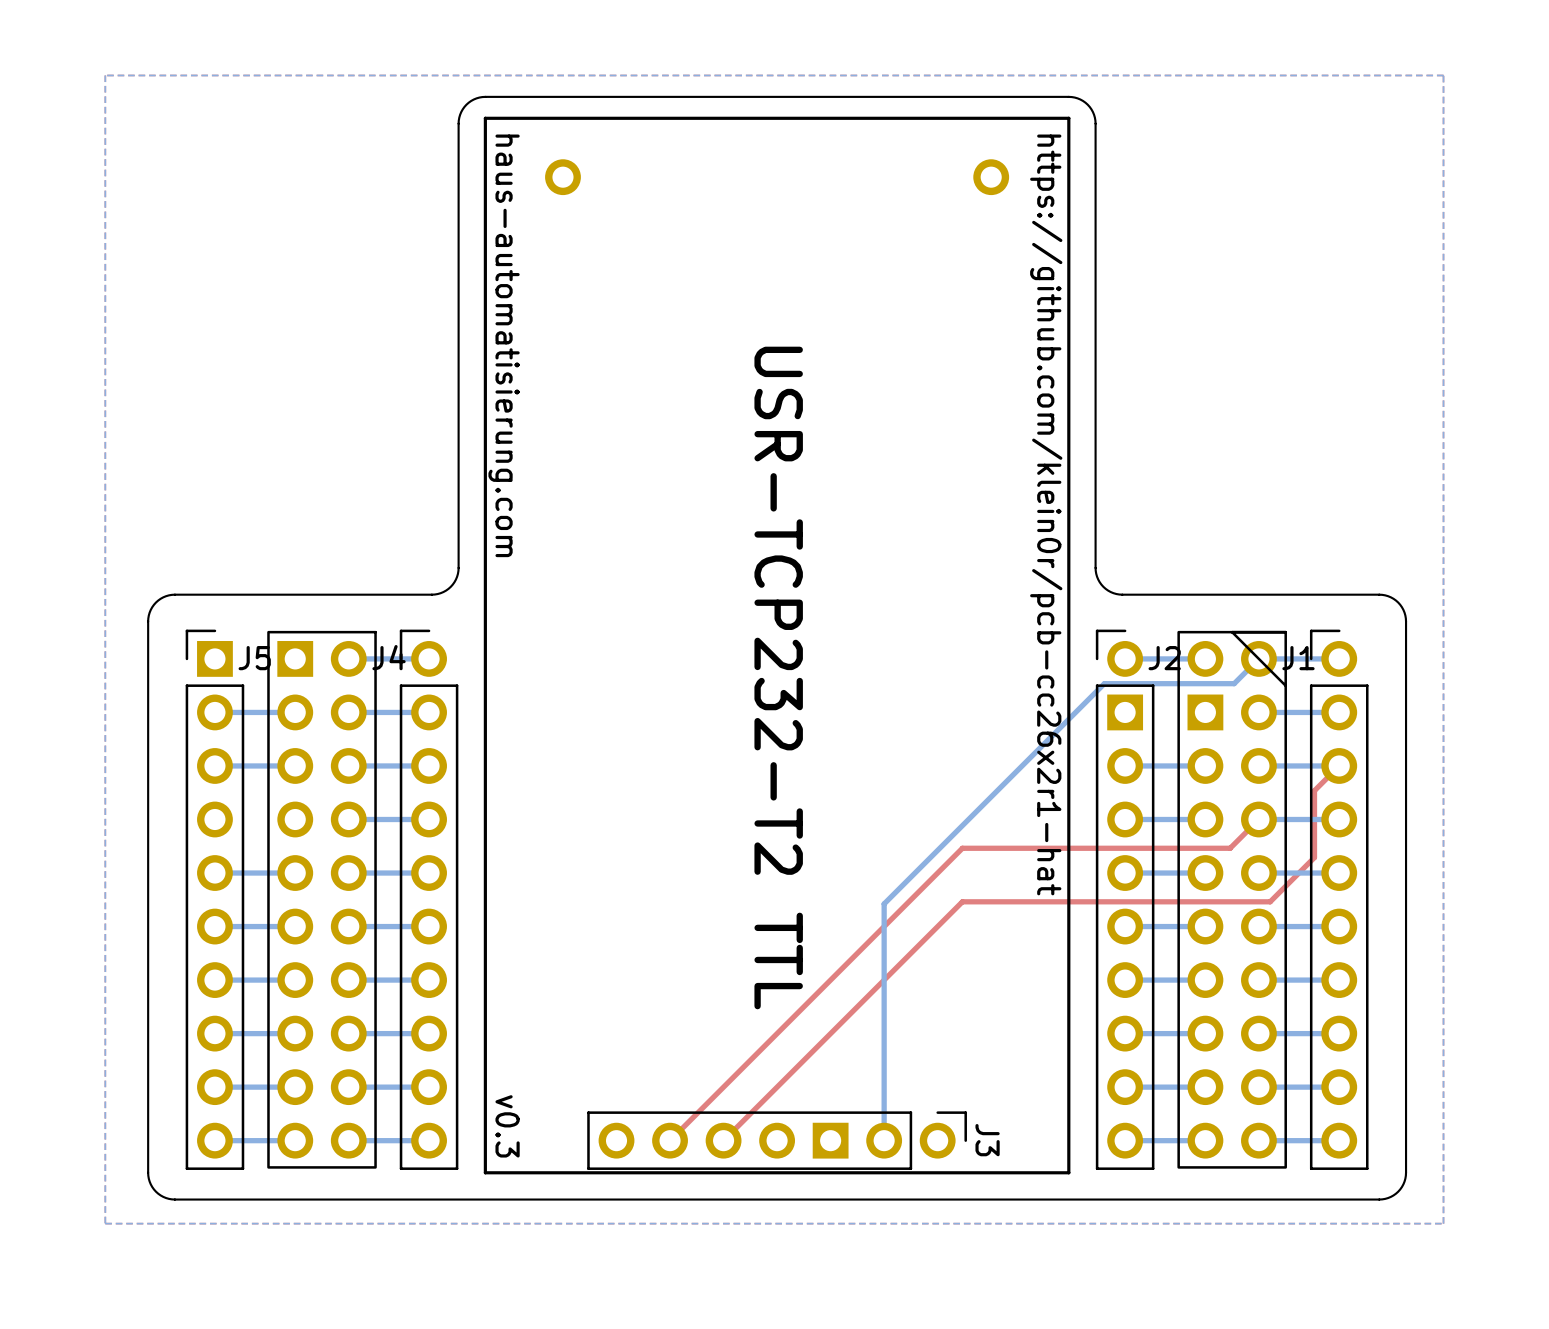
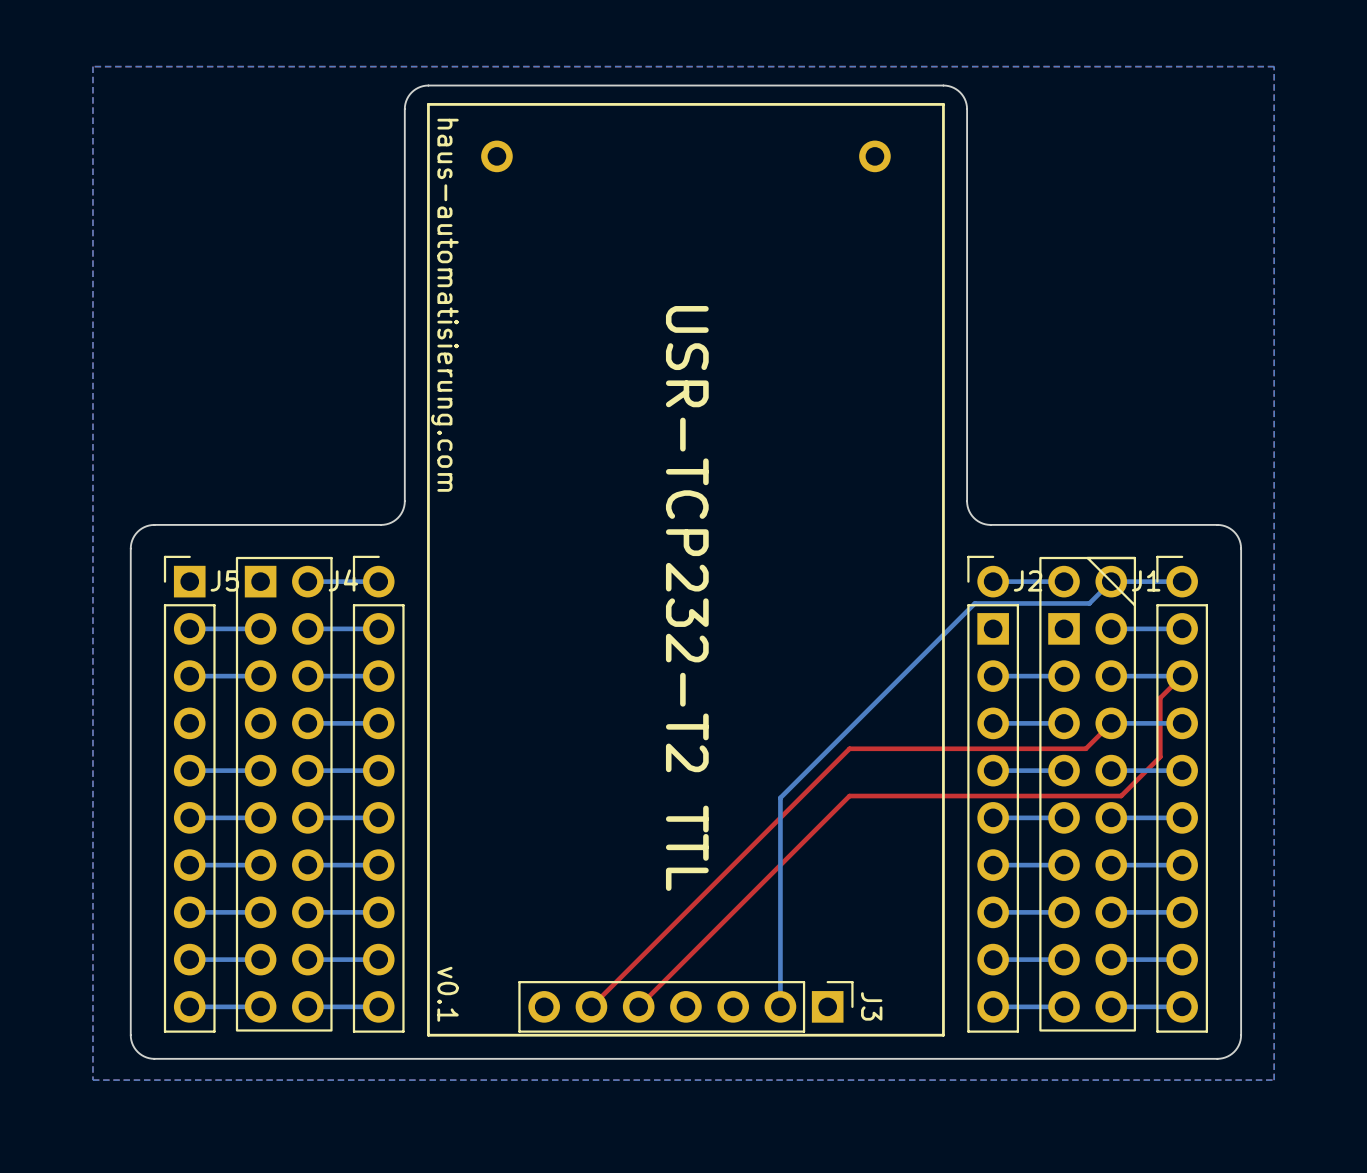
text: https://github.com/klein0r/pcb-cc26x2r1-hat (1046, 514) -> none
J3 footprint: [587, 1111, 967, 1170] -> [518, 981, 854, 1033]
text: v0.3 (507, 1126) -> v0.1 (448, 994)

